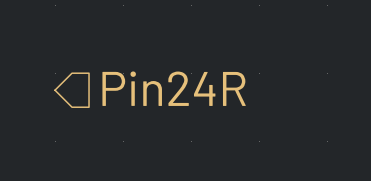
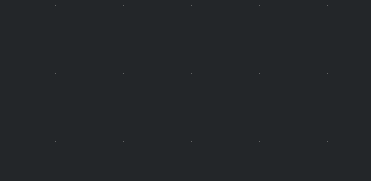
hierarchical label: Pin24R (174, 88) -> none

